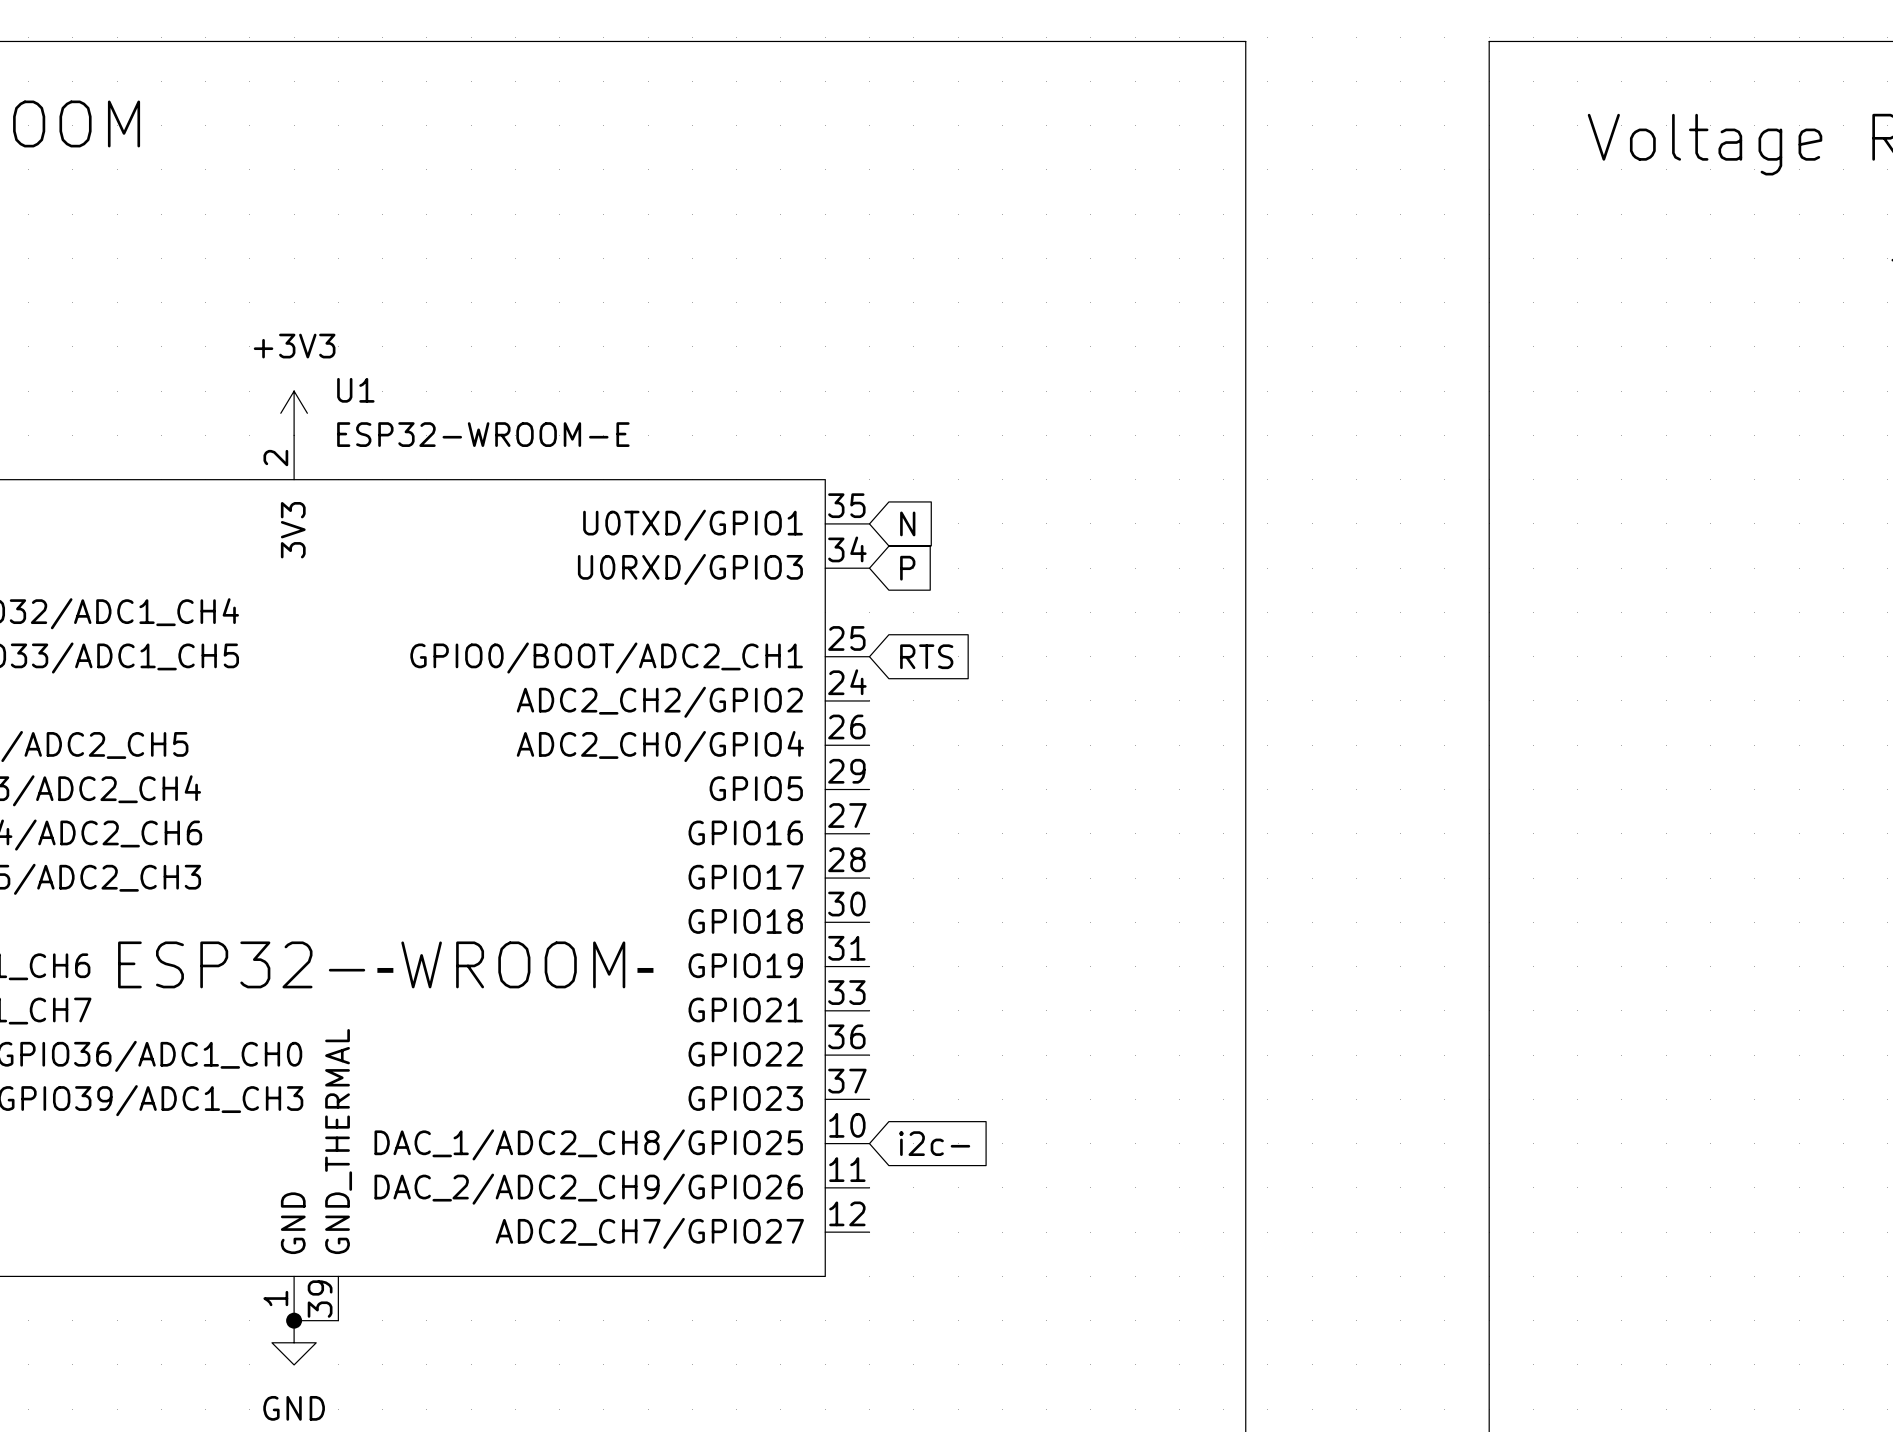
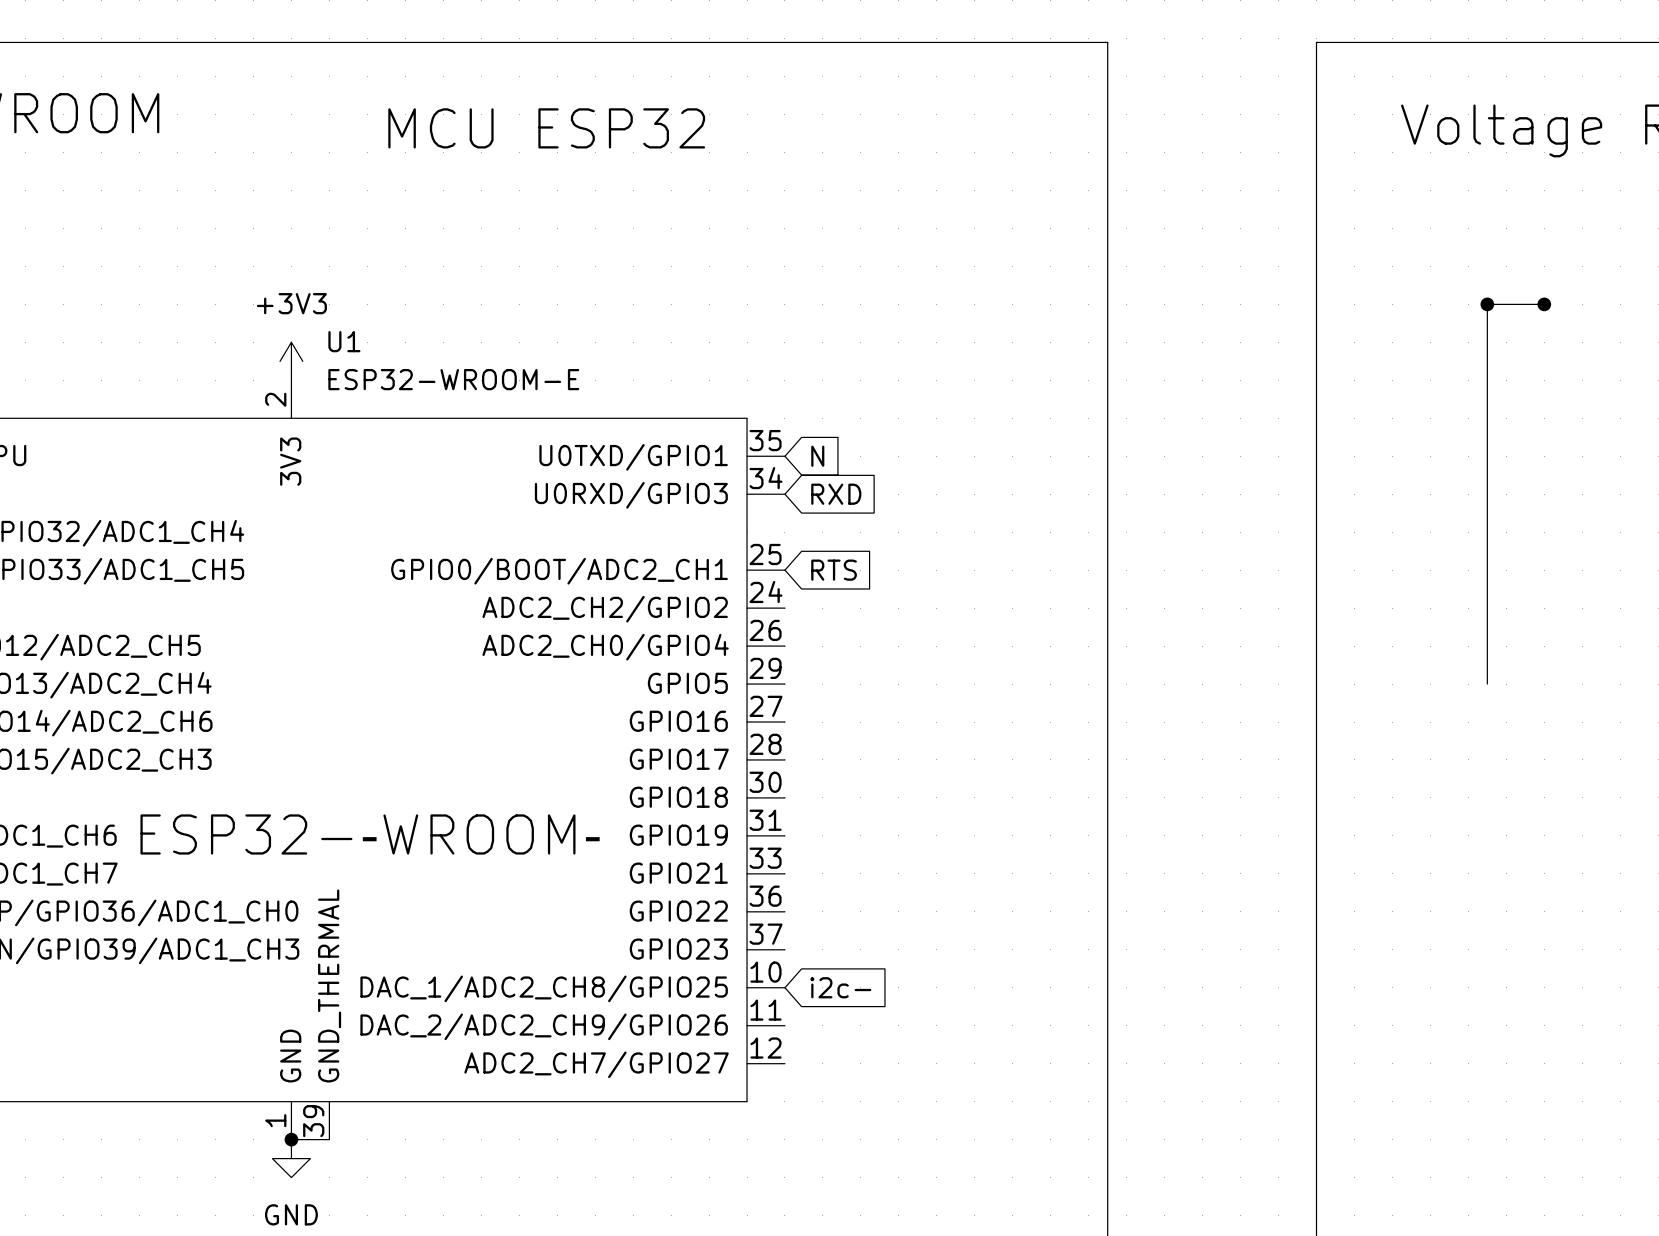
text: none -> MCU ESP32 (546, 128)
junction: none -> (1487, 304)
wire: none -> (1544, 304) (1487, 304) (1487, 684)
junction: none -> (1544, 304)
global label: P (907, 568) -> RXD (836, 494)

